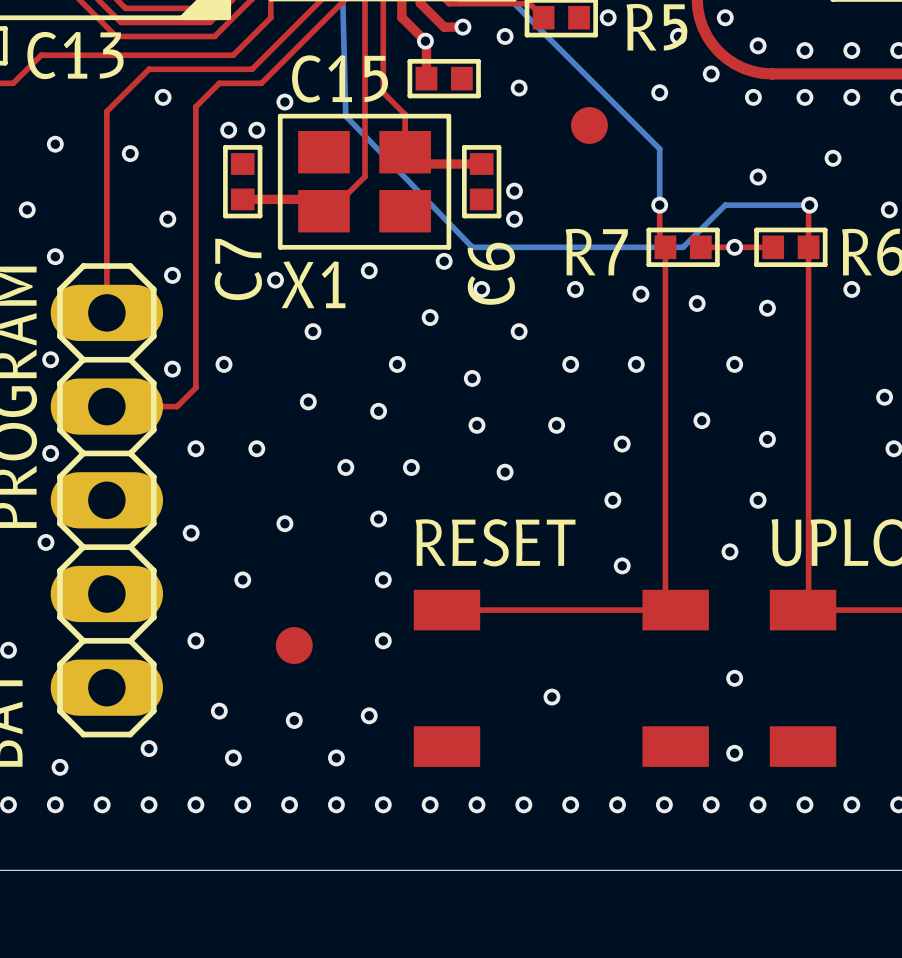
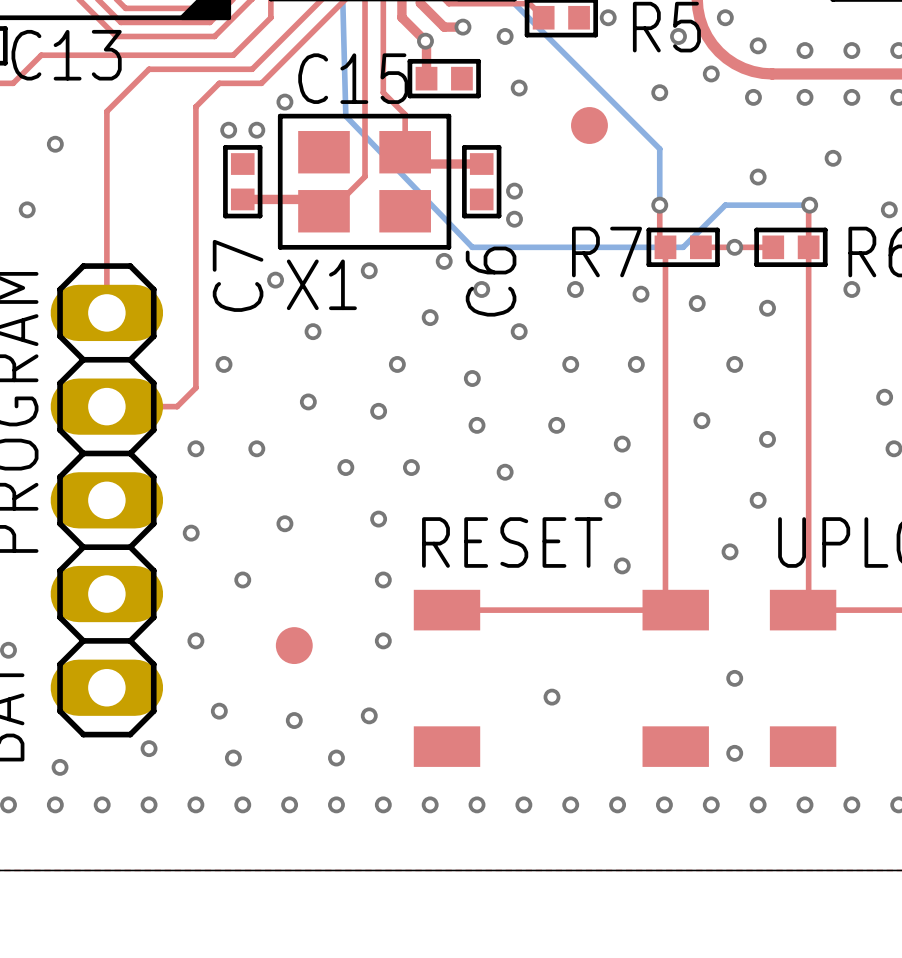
via: (163, 97) -> none
via: (130, 153) -> none
via: (167, 219) -> none
via: (55, 256) -> none
via: (172, 275) -> none
via: (50, 359) -> none
via: (172, 369) -> none
via: (50, 453) -> none
via: (45, 542) -> none

